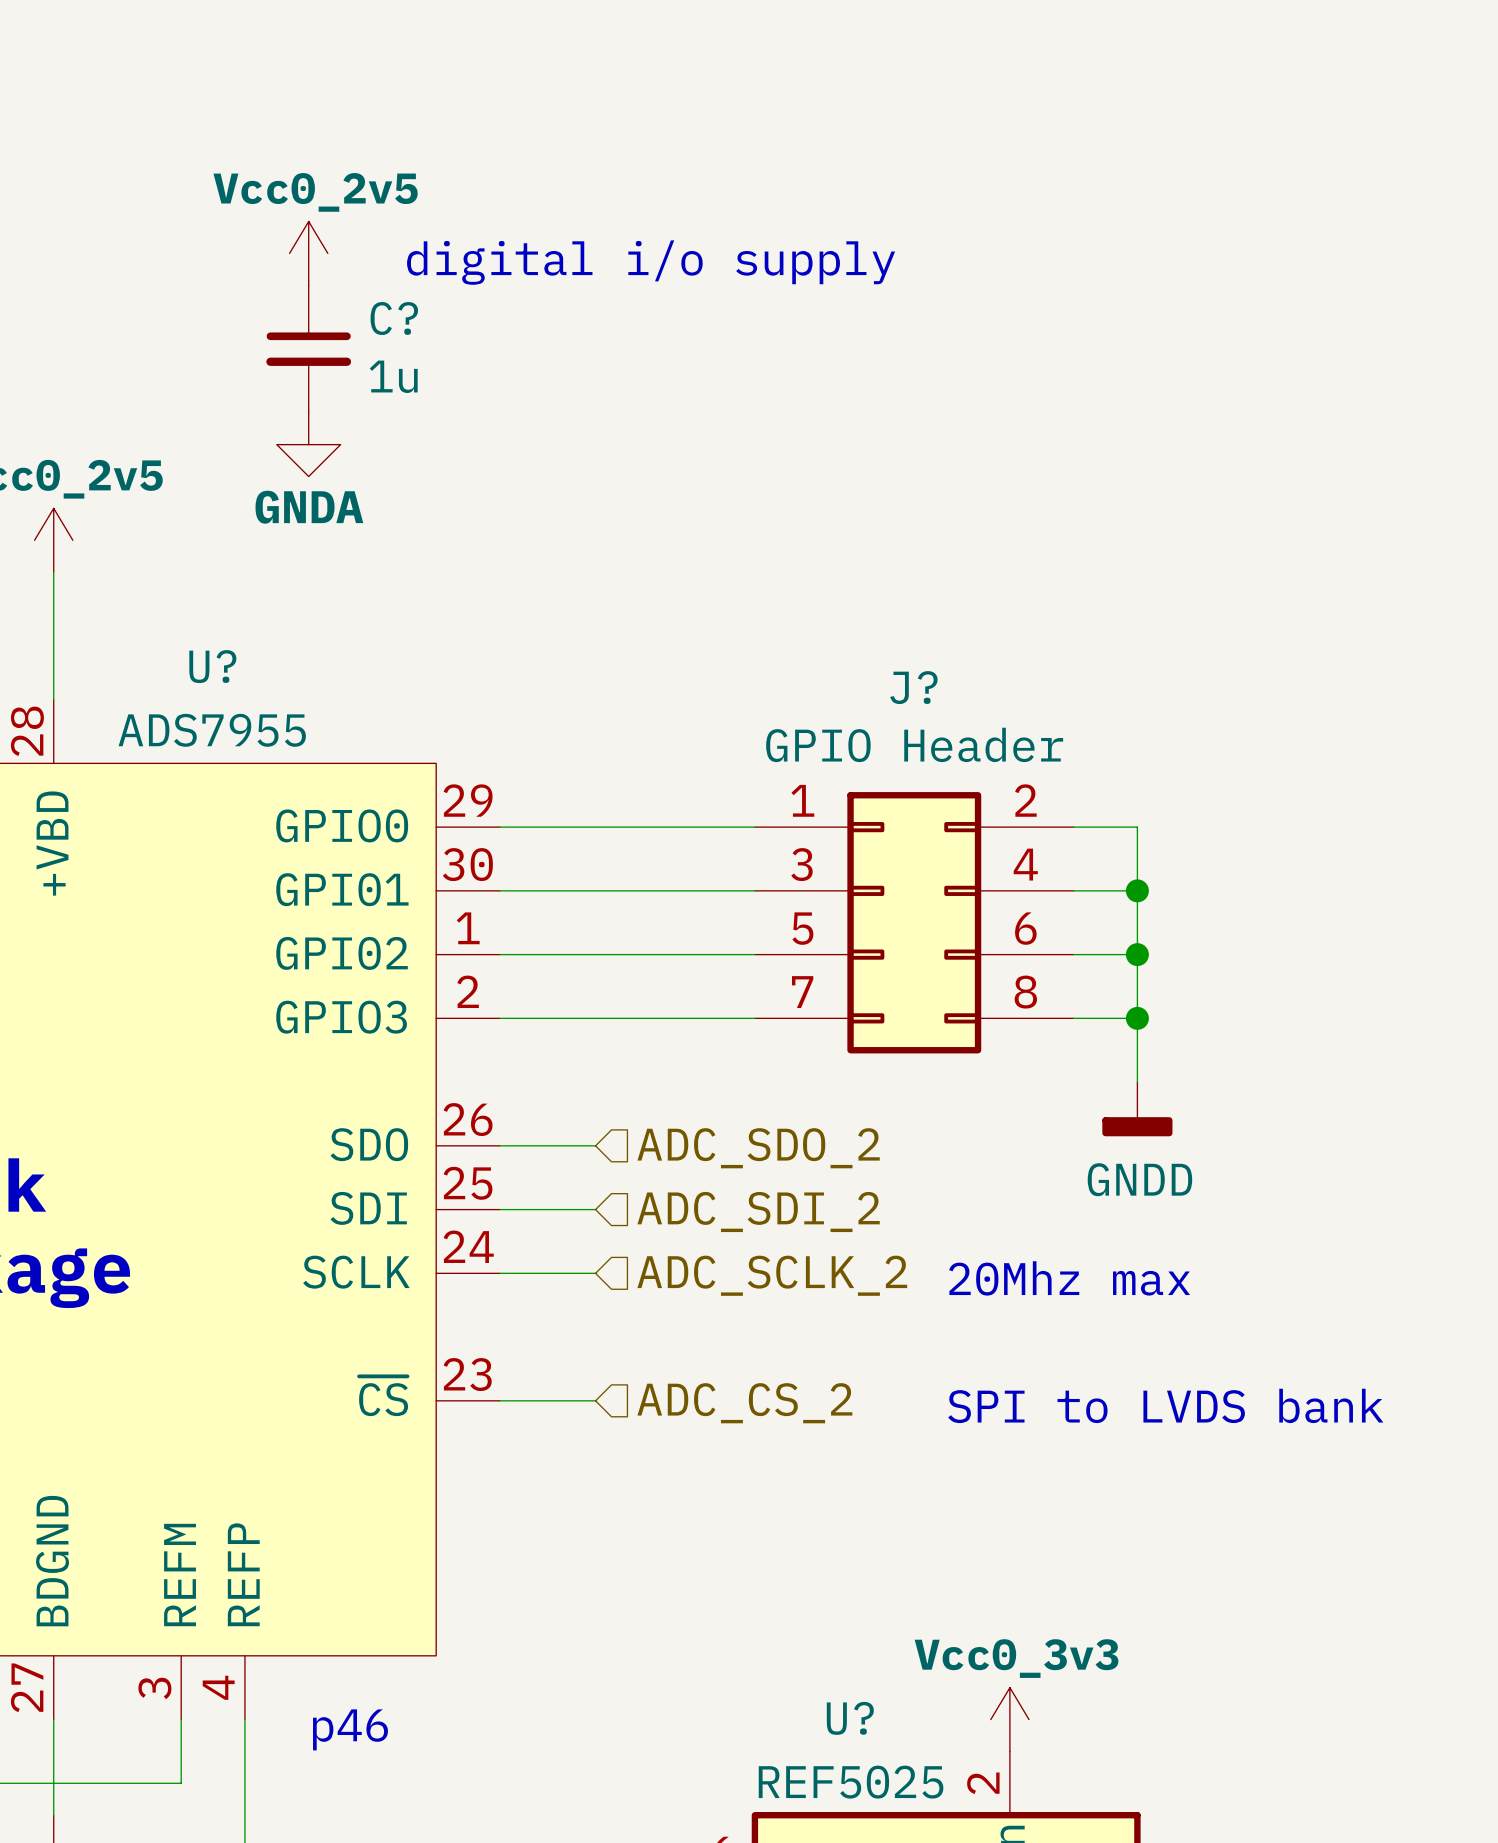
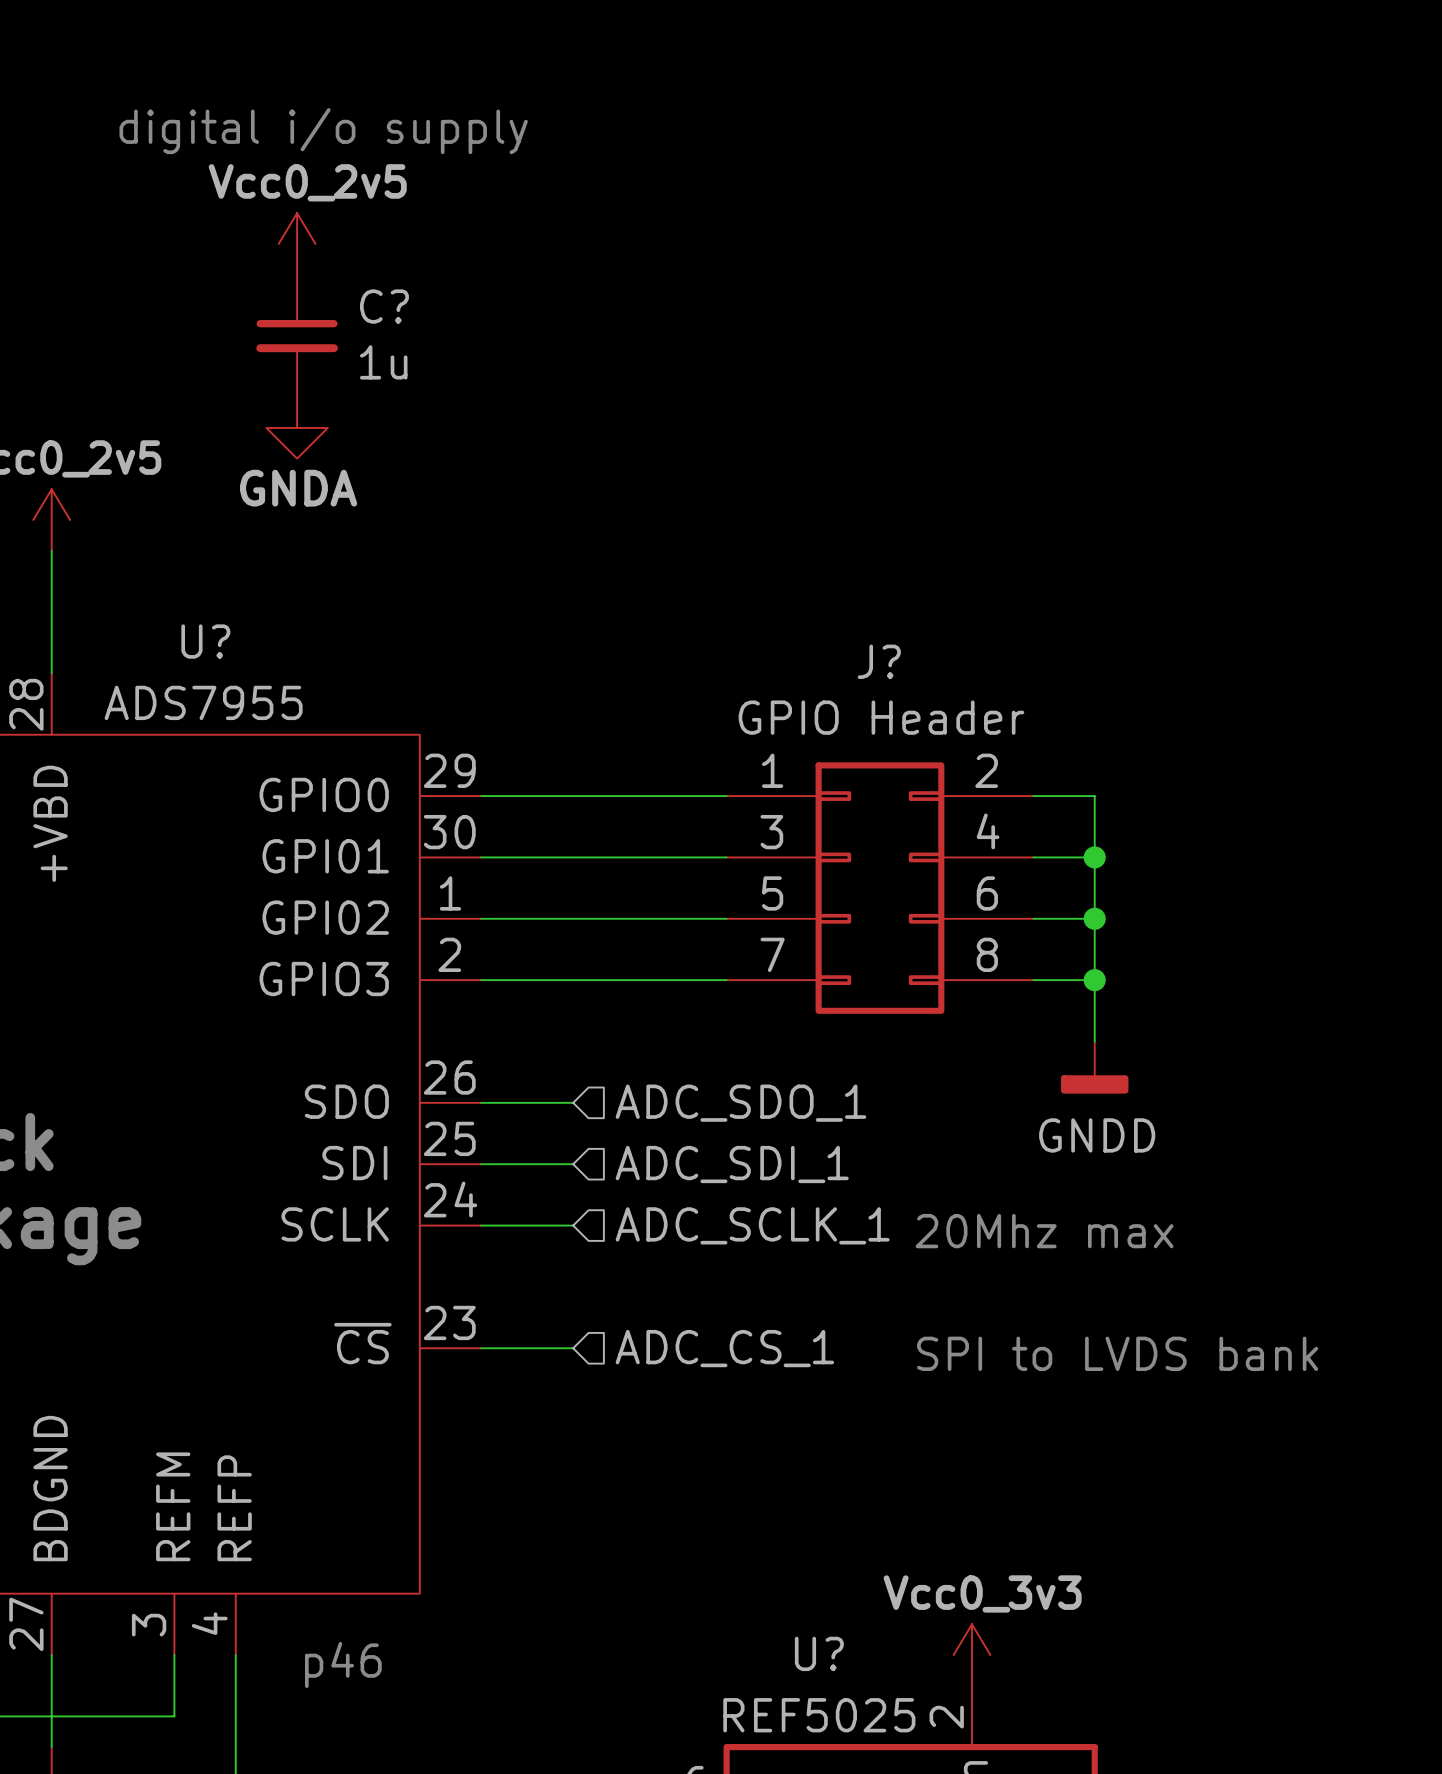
text position: digital i/o supply (651, 262) -> digital i/o supply (323, 131)
hierarchical label: ADC_SDO_2 (758, 1148) -> ADC_SDO_1 (740, 1103)
hierarchical label: ADC_SDI_2 (758, 1211) -> ADC_SDI_1 (732, 1164)
hierarchical label: ADC_SCLK_2 (772, 1275) -> ADC_SCLK_1 (752, 1225)
hierarchical label: ADC_CS_2 (744, 1403) -> ADC_CS_1 (724, 1348)

